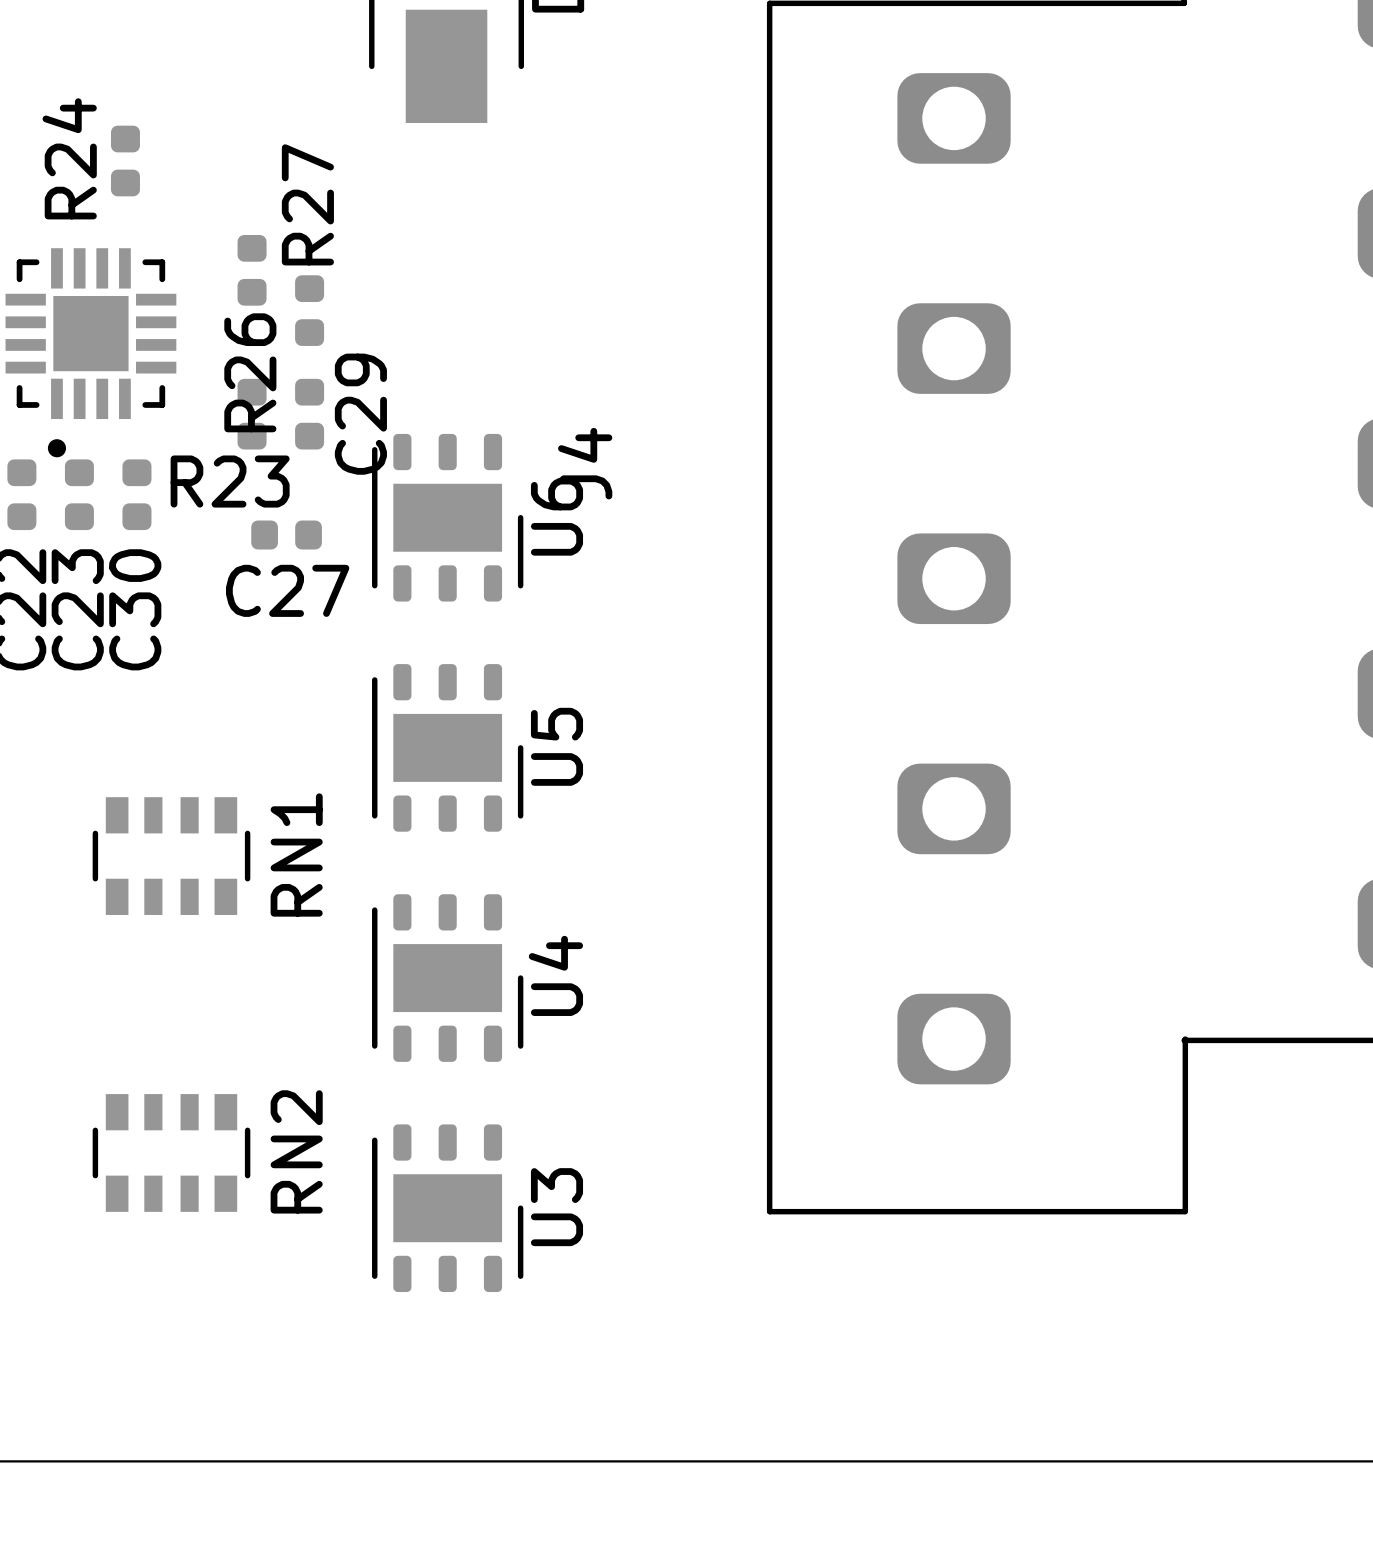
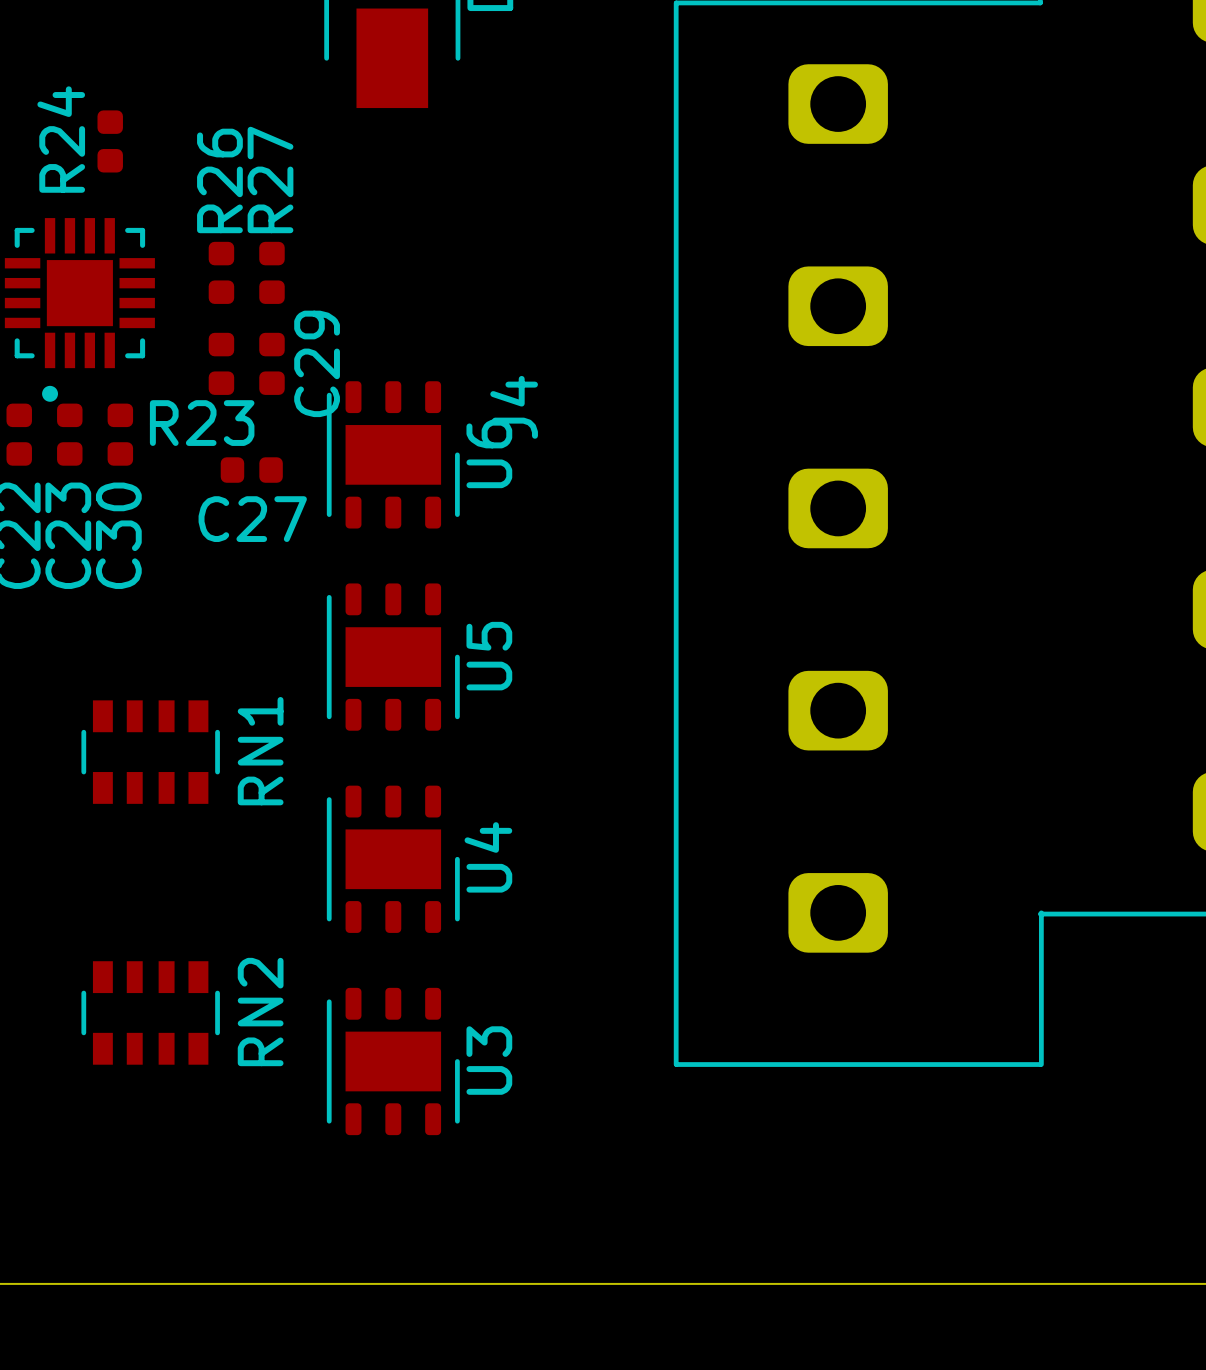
R26 position: (252, 270) -> (221, 272)
R26 name position: R26 (250, 372) -> R26 (219, 180)

